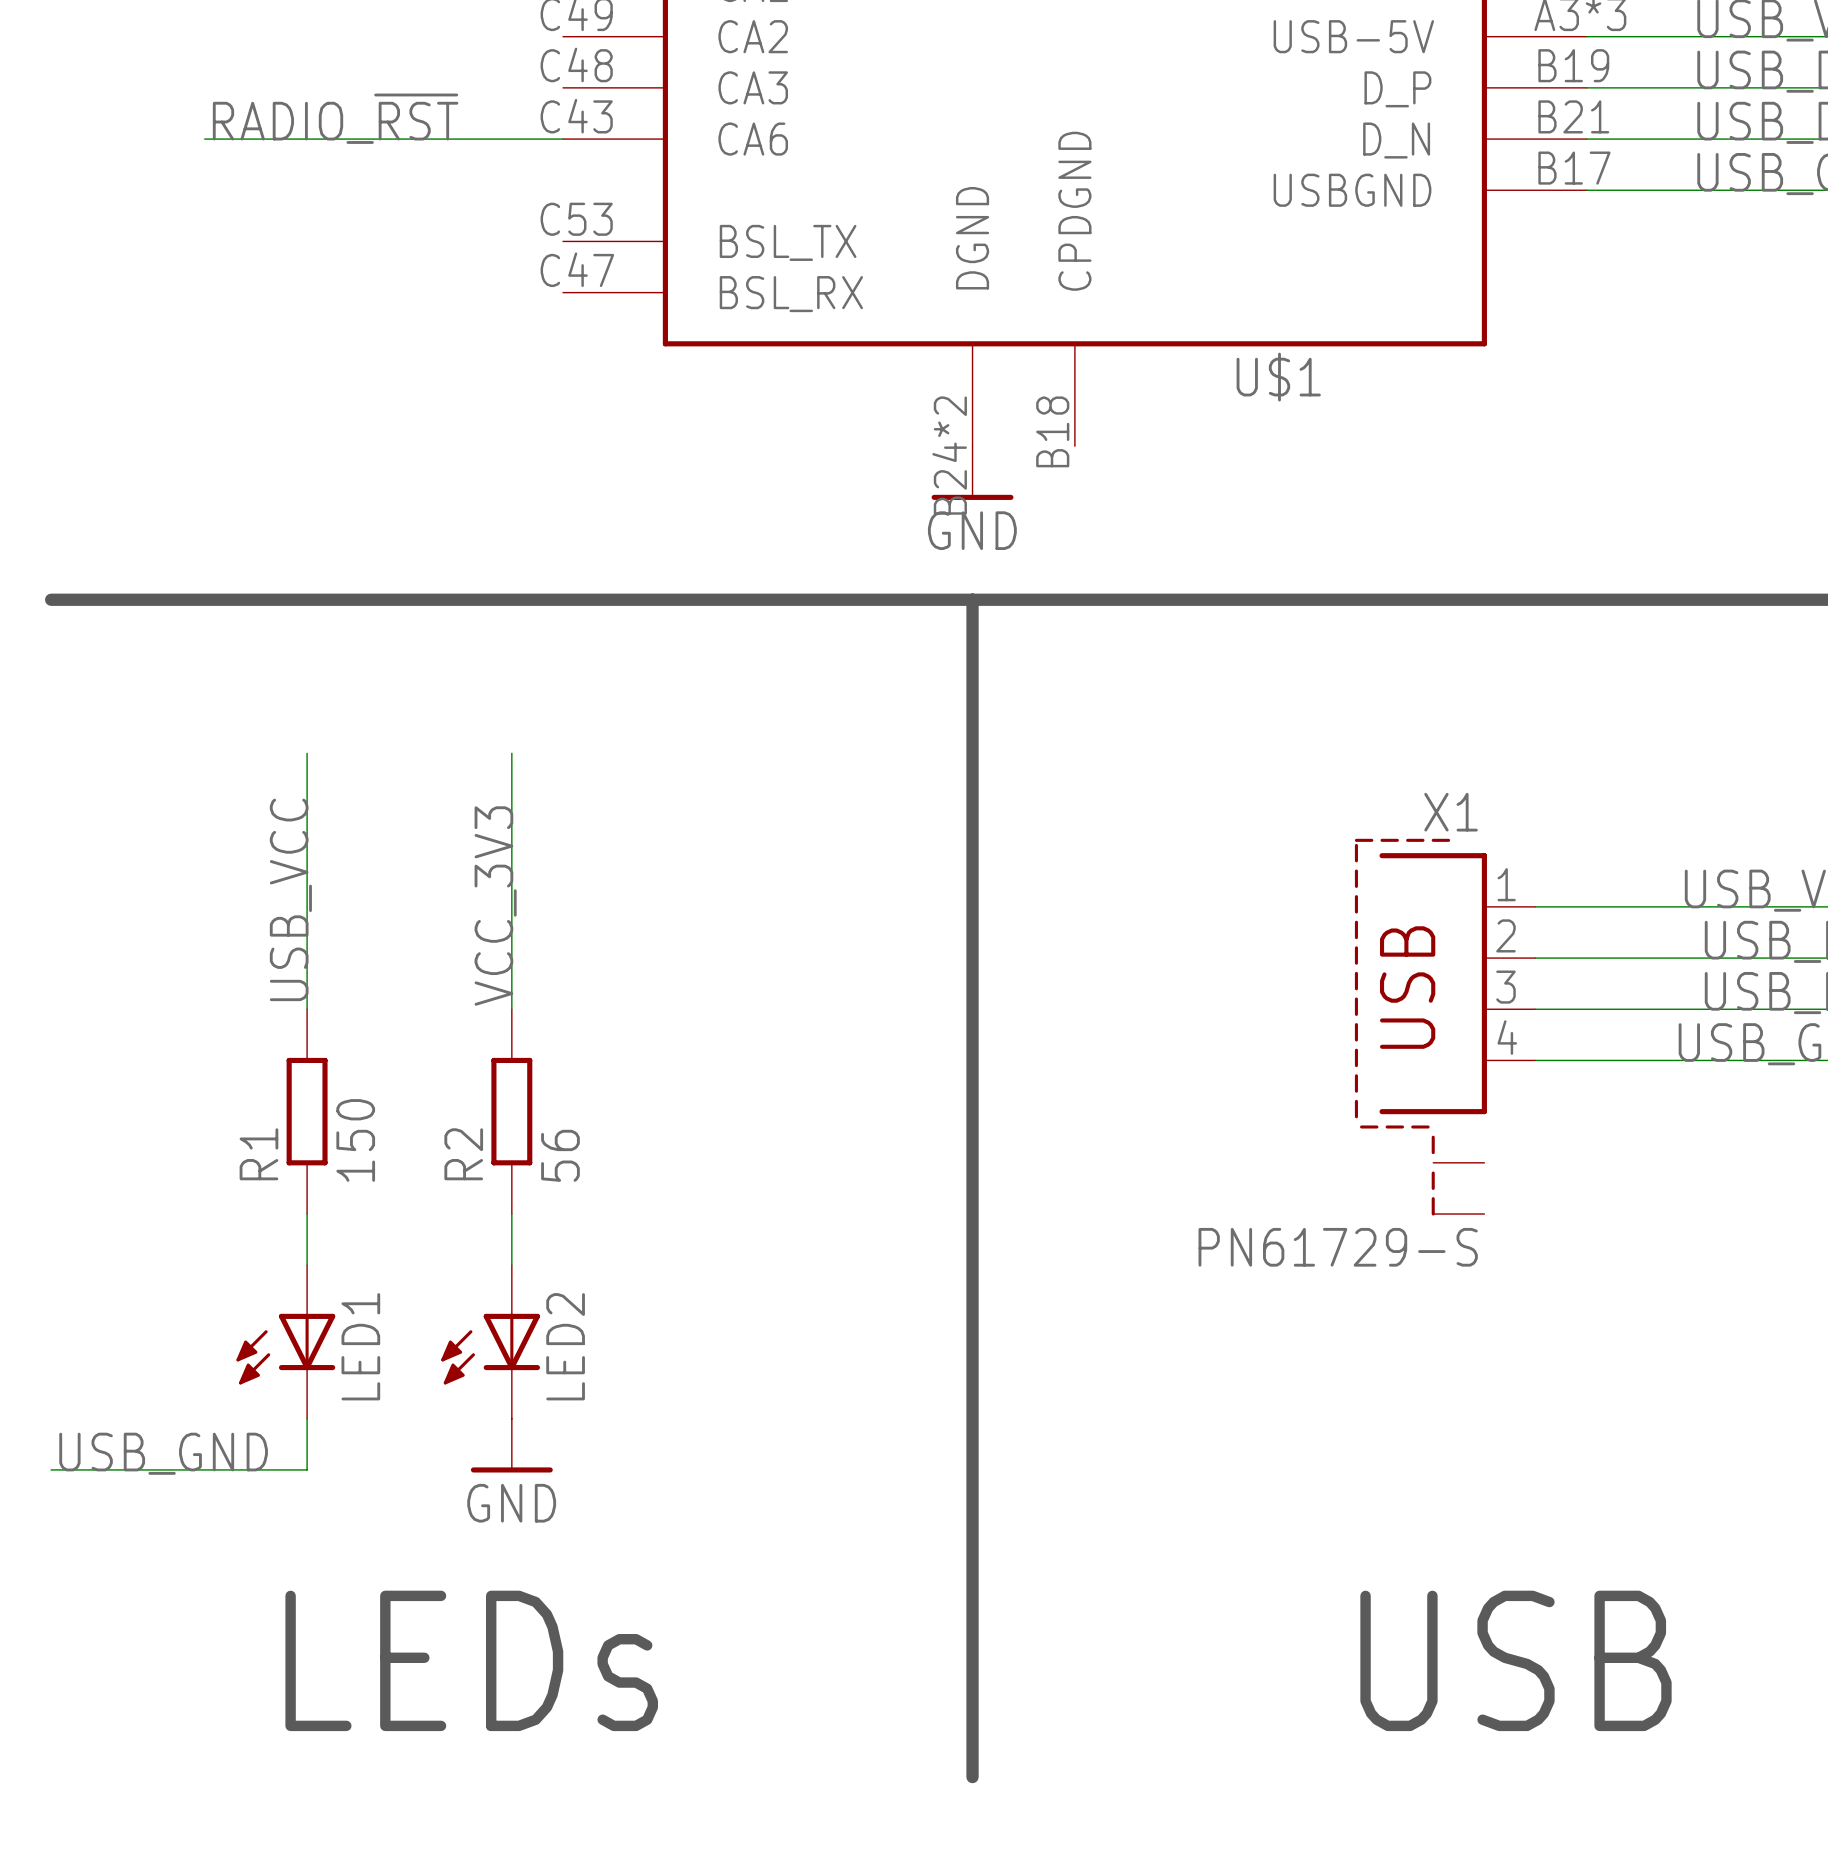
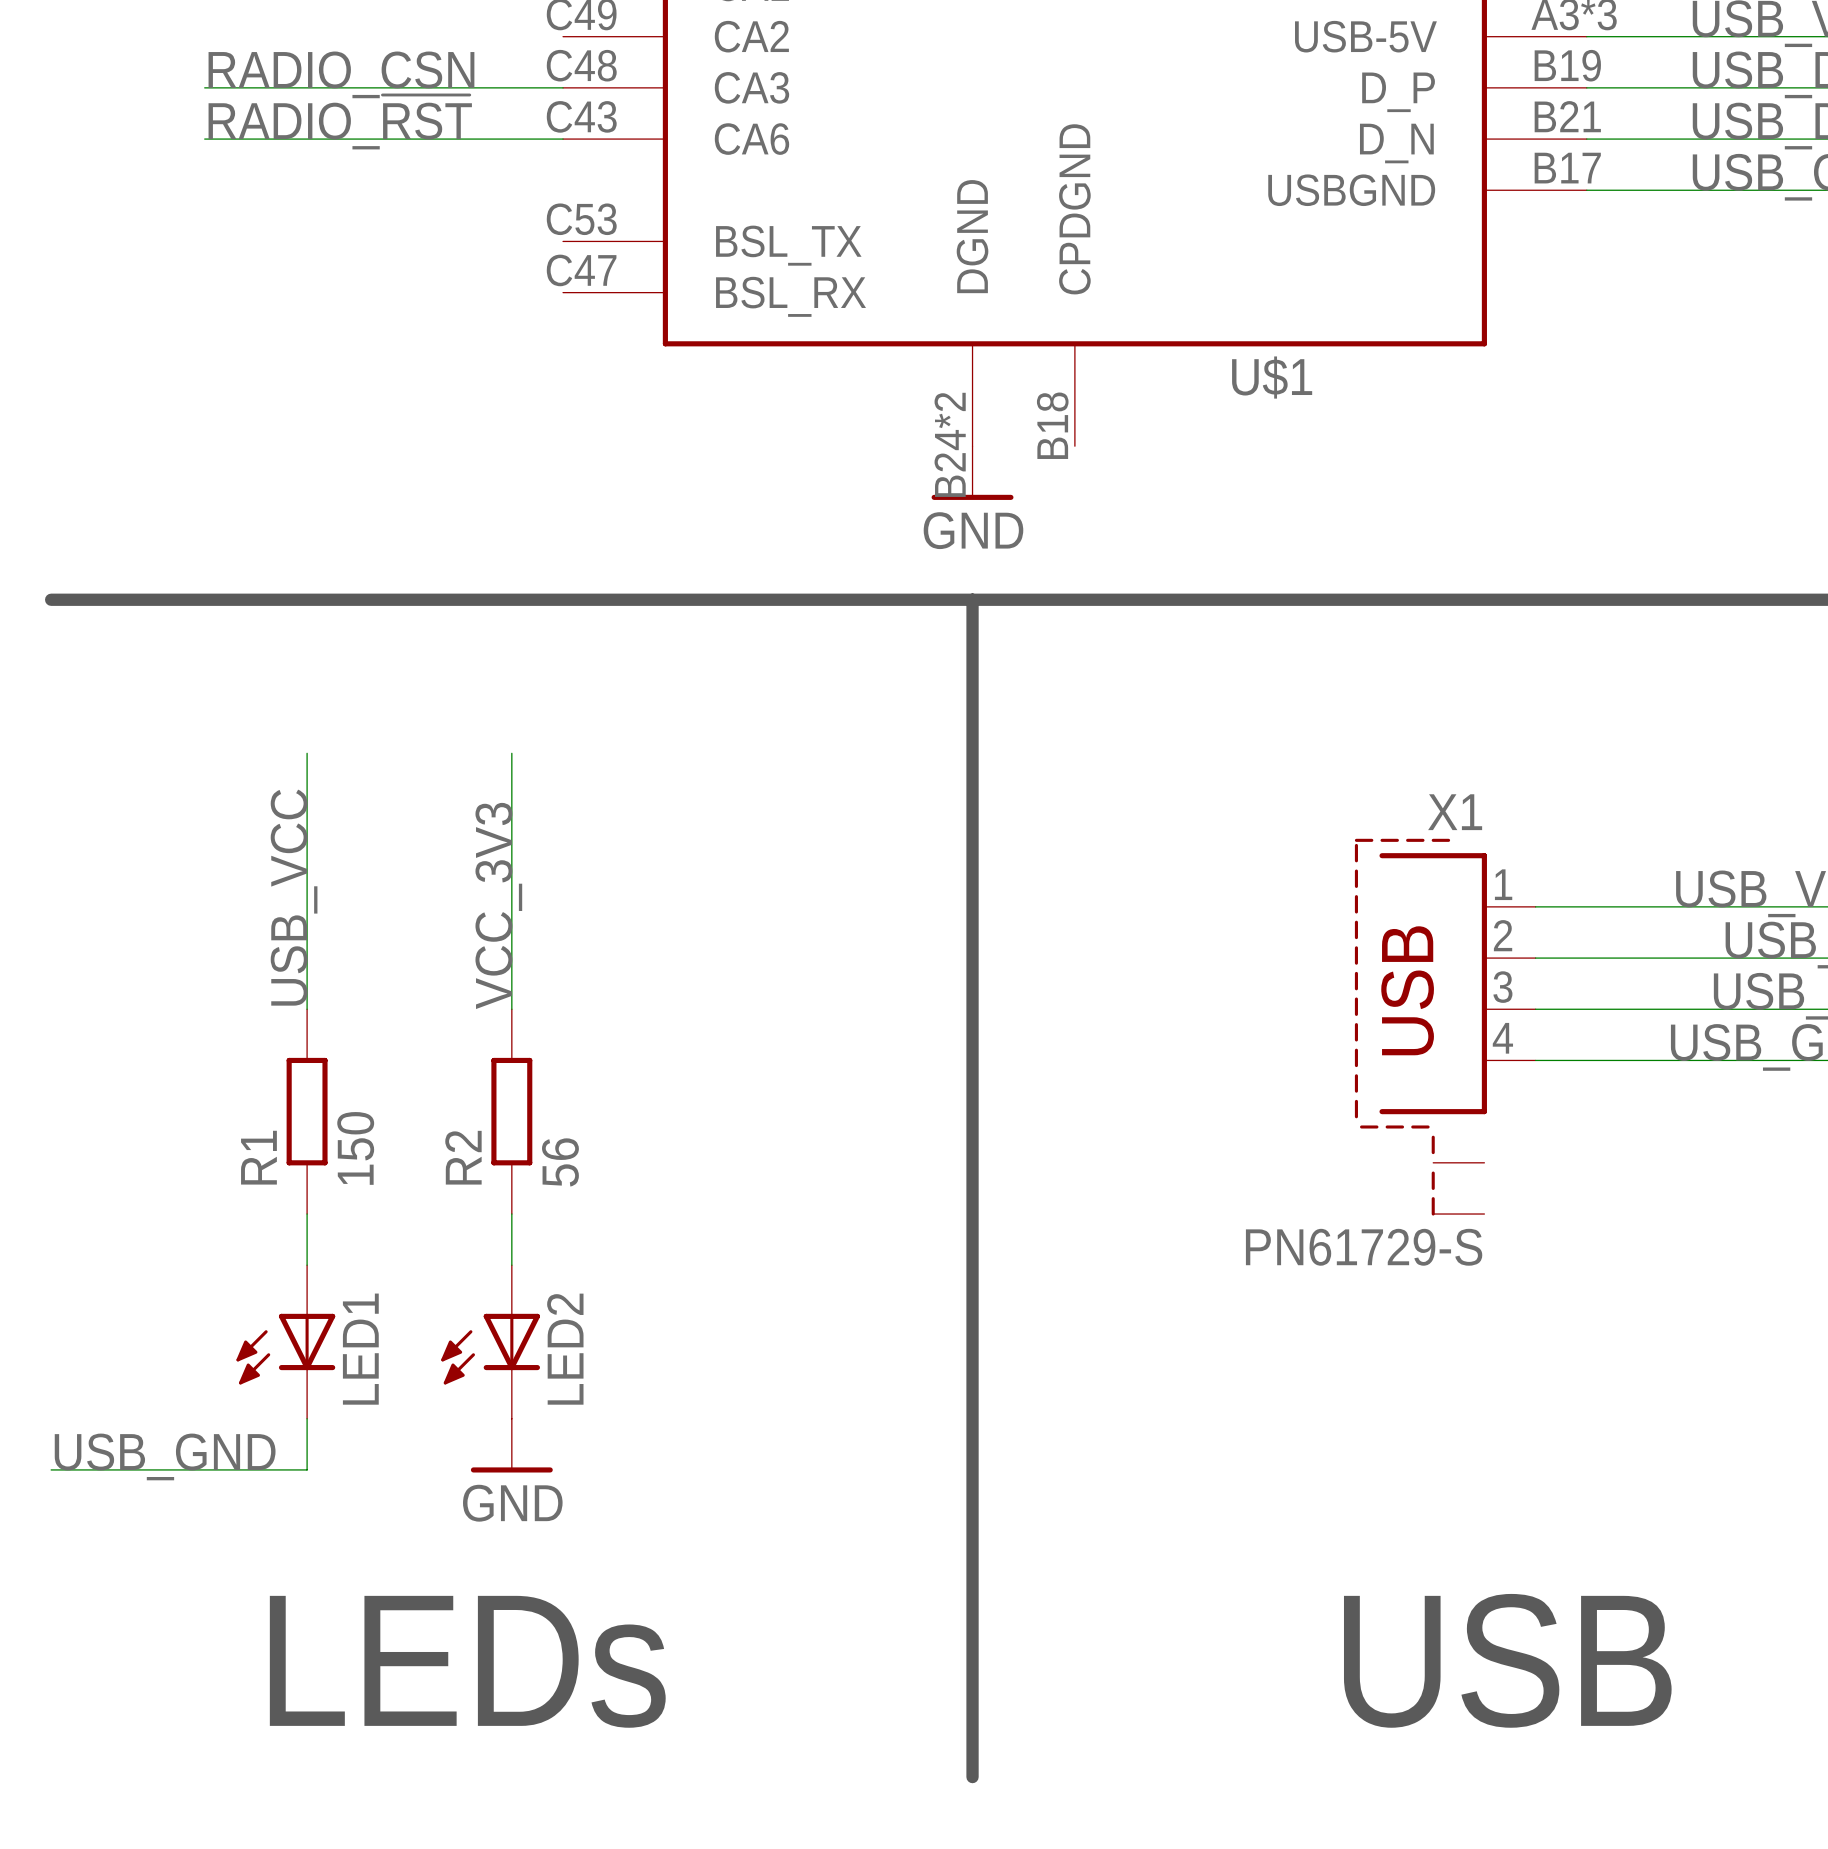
label: none -> RADIO_CSN (341, 74)
wire: none -> (204, 87) (563, 87)

